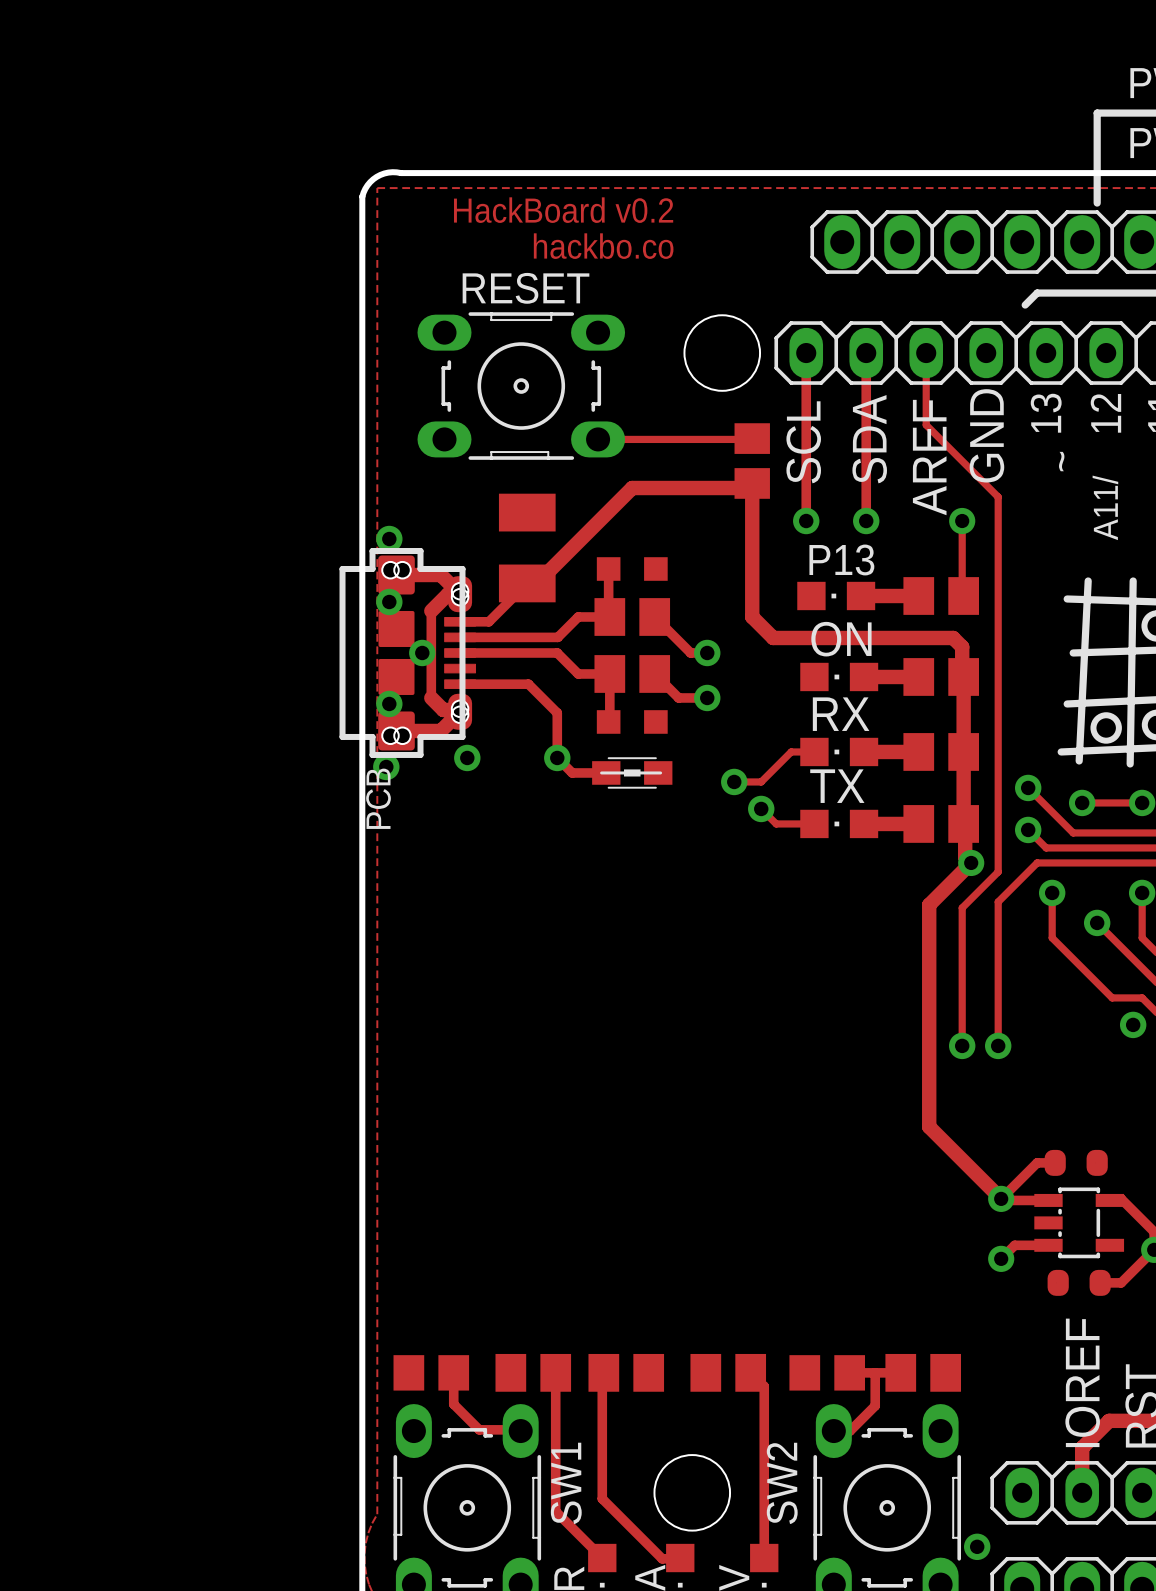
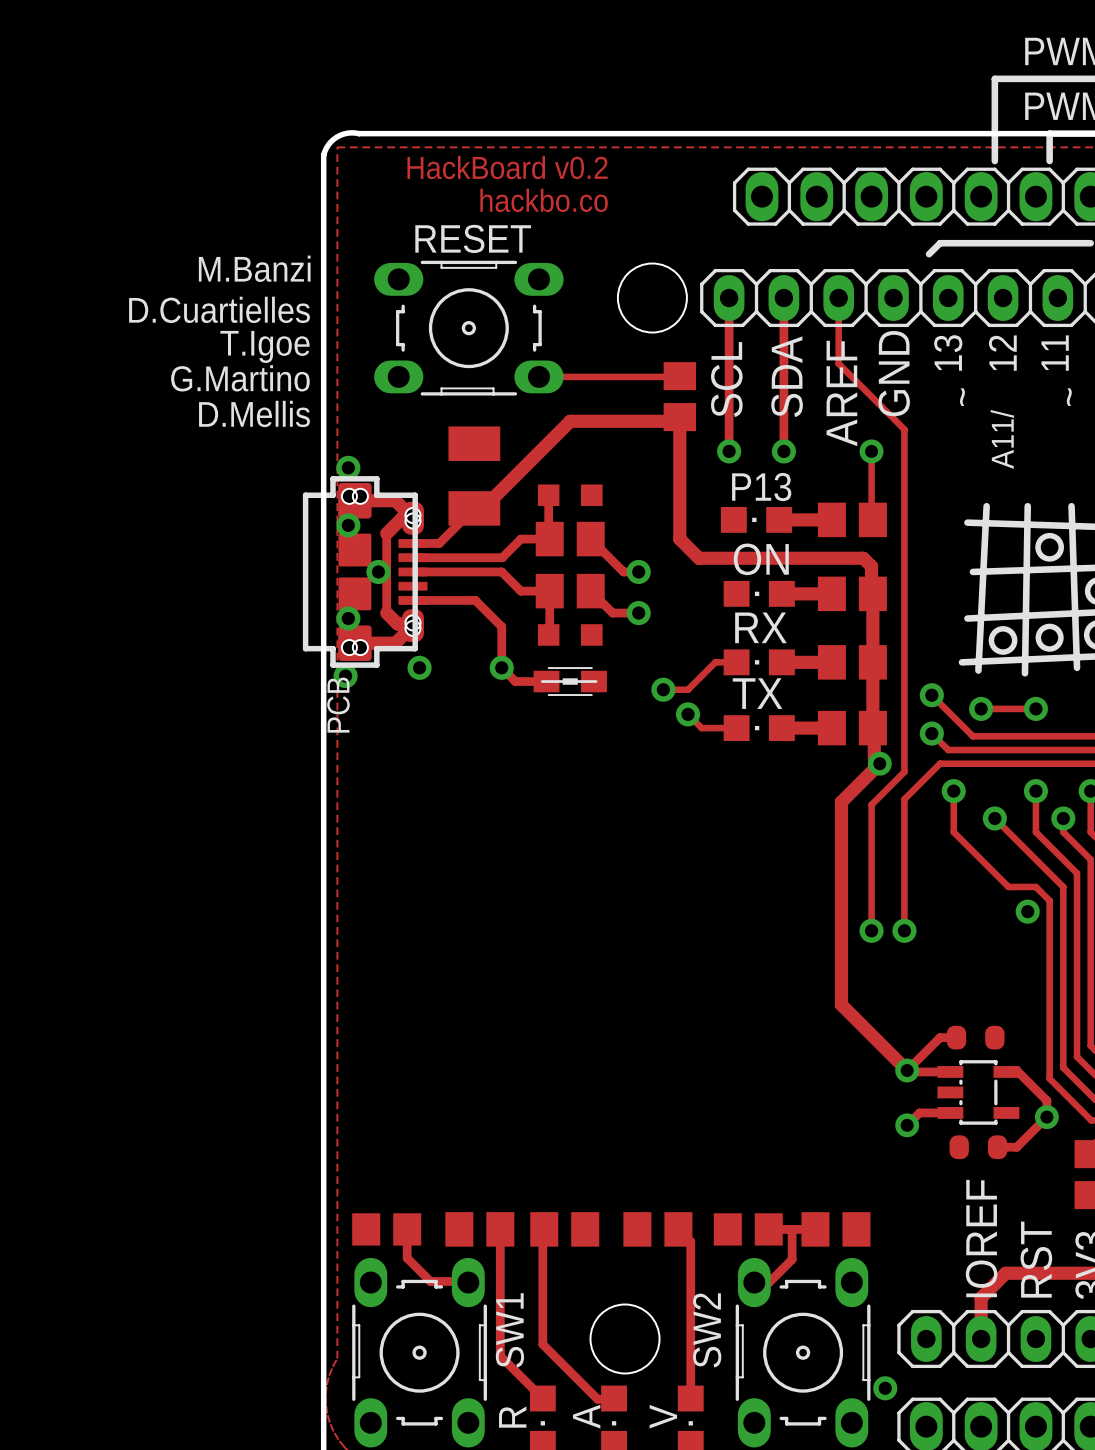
text: none -> M.Banzi (254, 268)
text: none -> D.Cuartielles (219, 309)
text: none -> T.Igoe (265, 346)
text: none -> G.Martino (240, 378)
text: none -> D.Mellis (254, 413)

